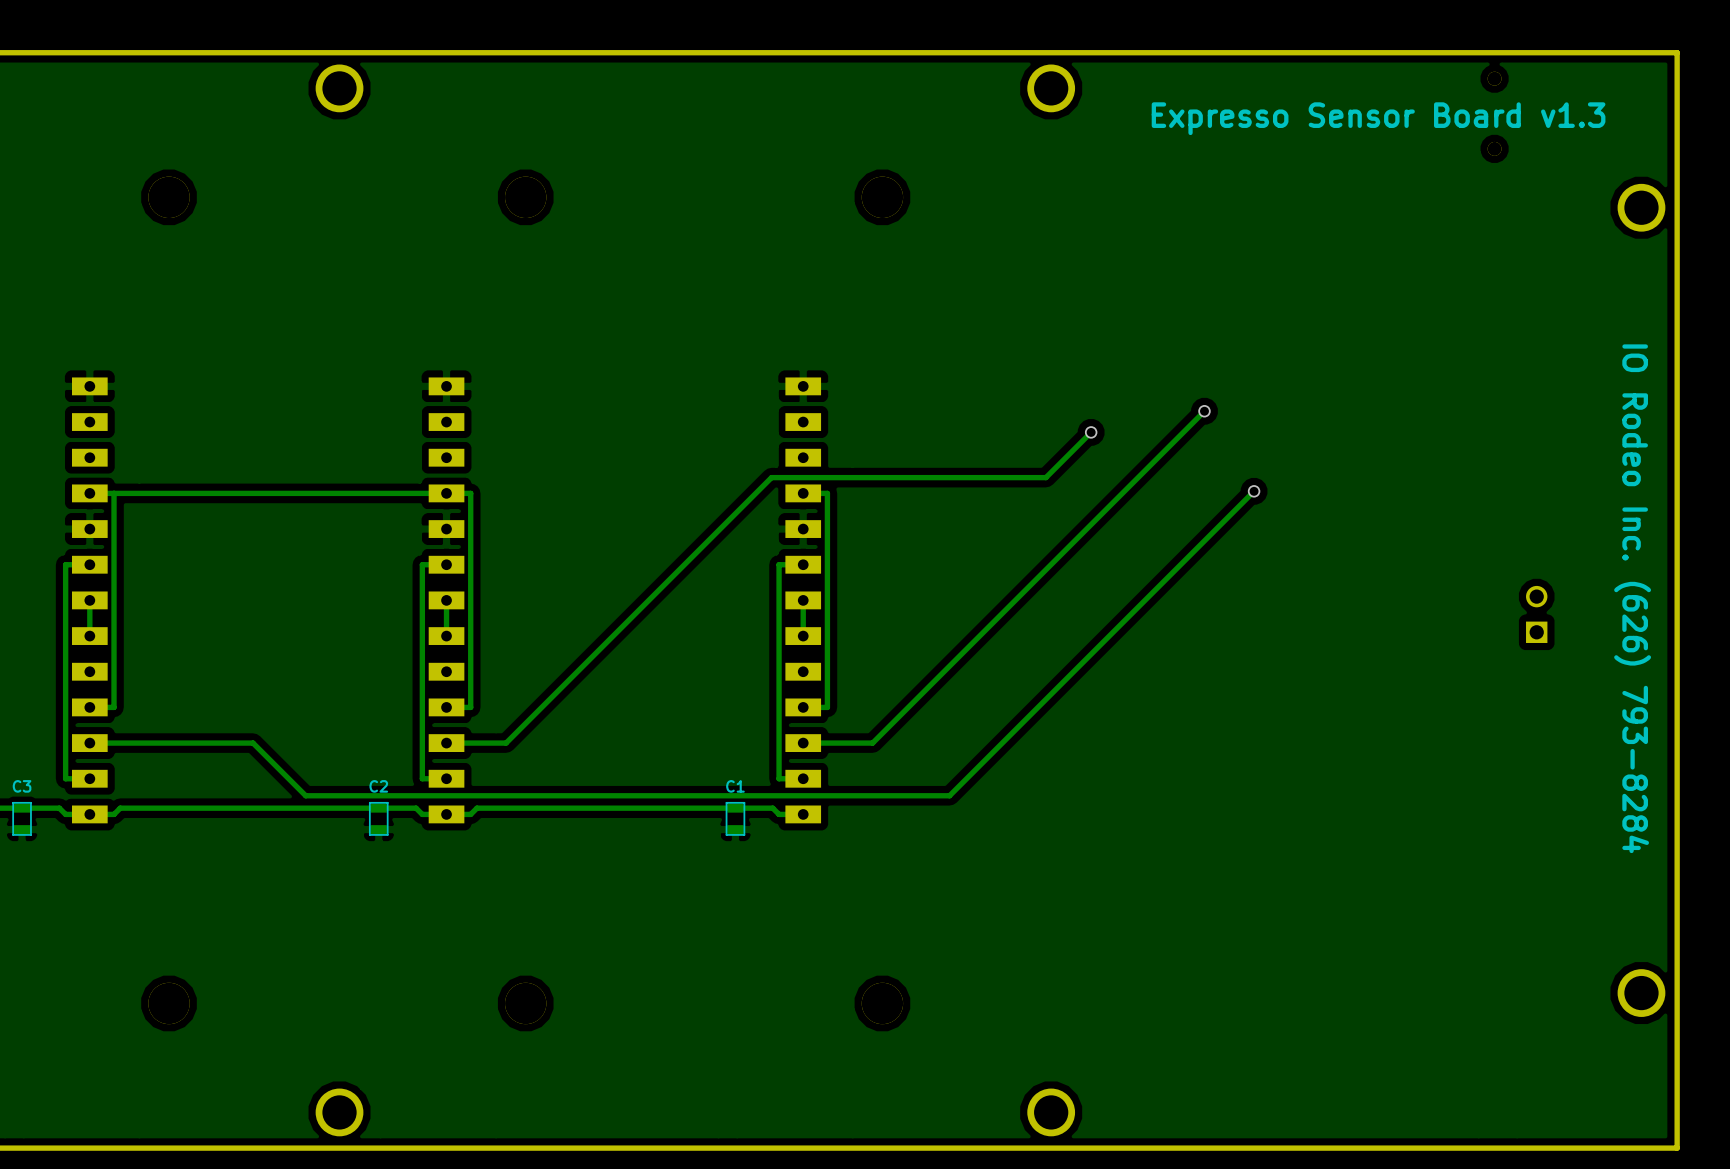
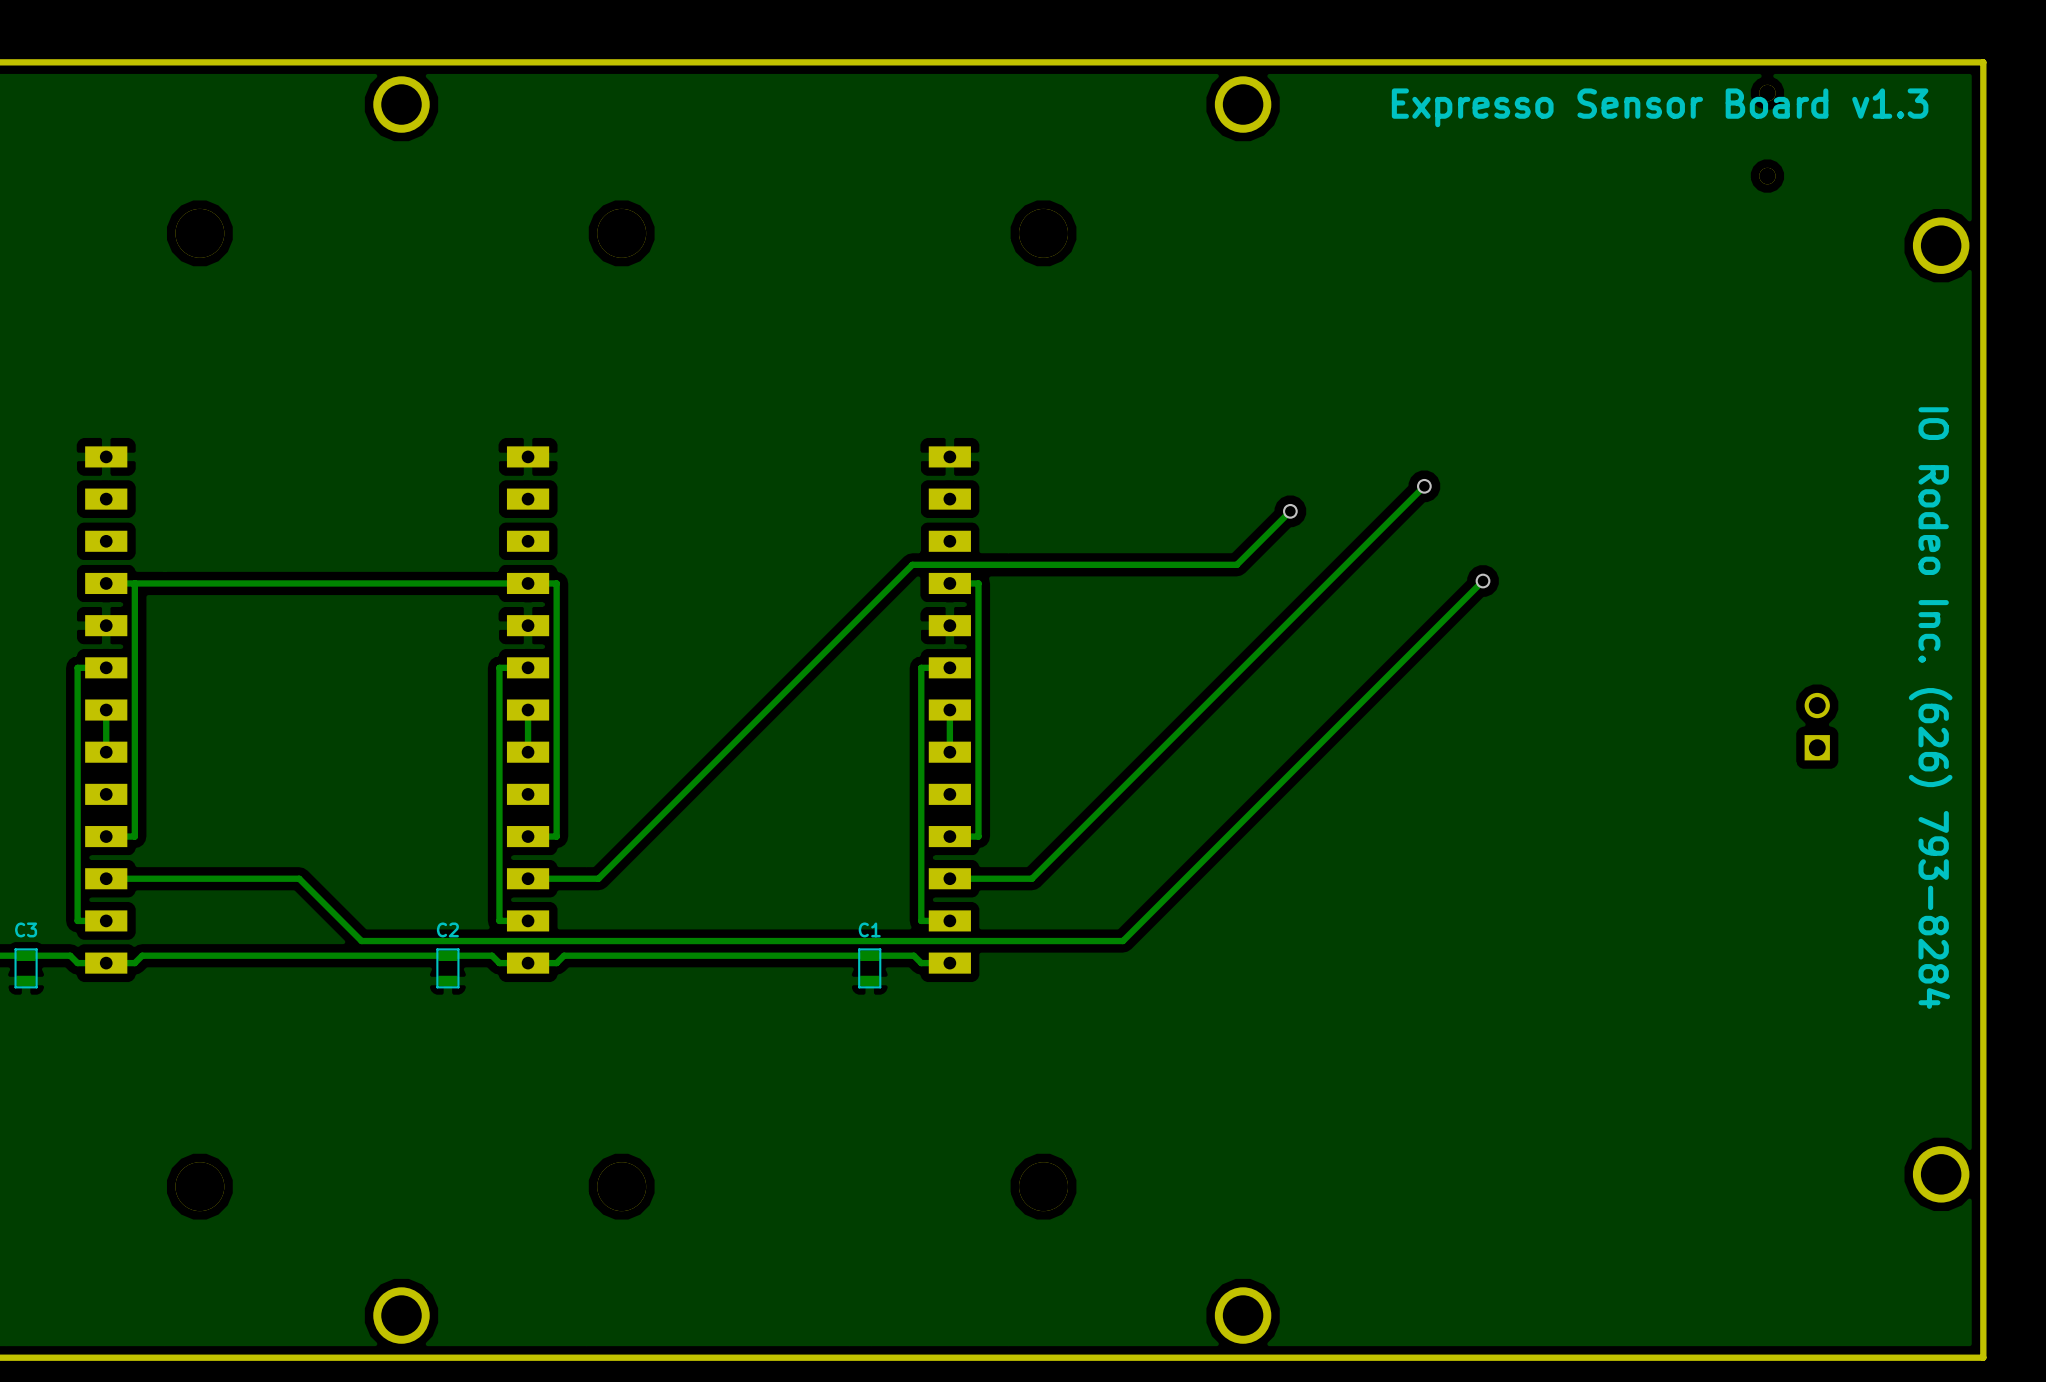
text position: Expresso Sensor Board v1.3 (1378, 118) -> Expresso Sensor Board v1.3 (1660, 107)

